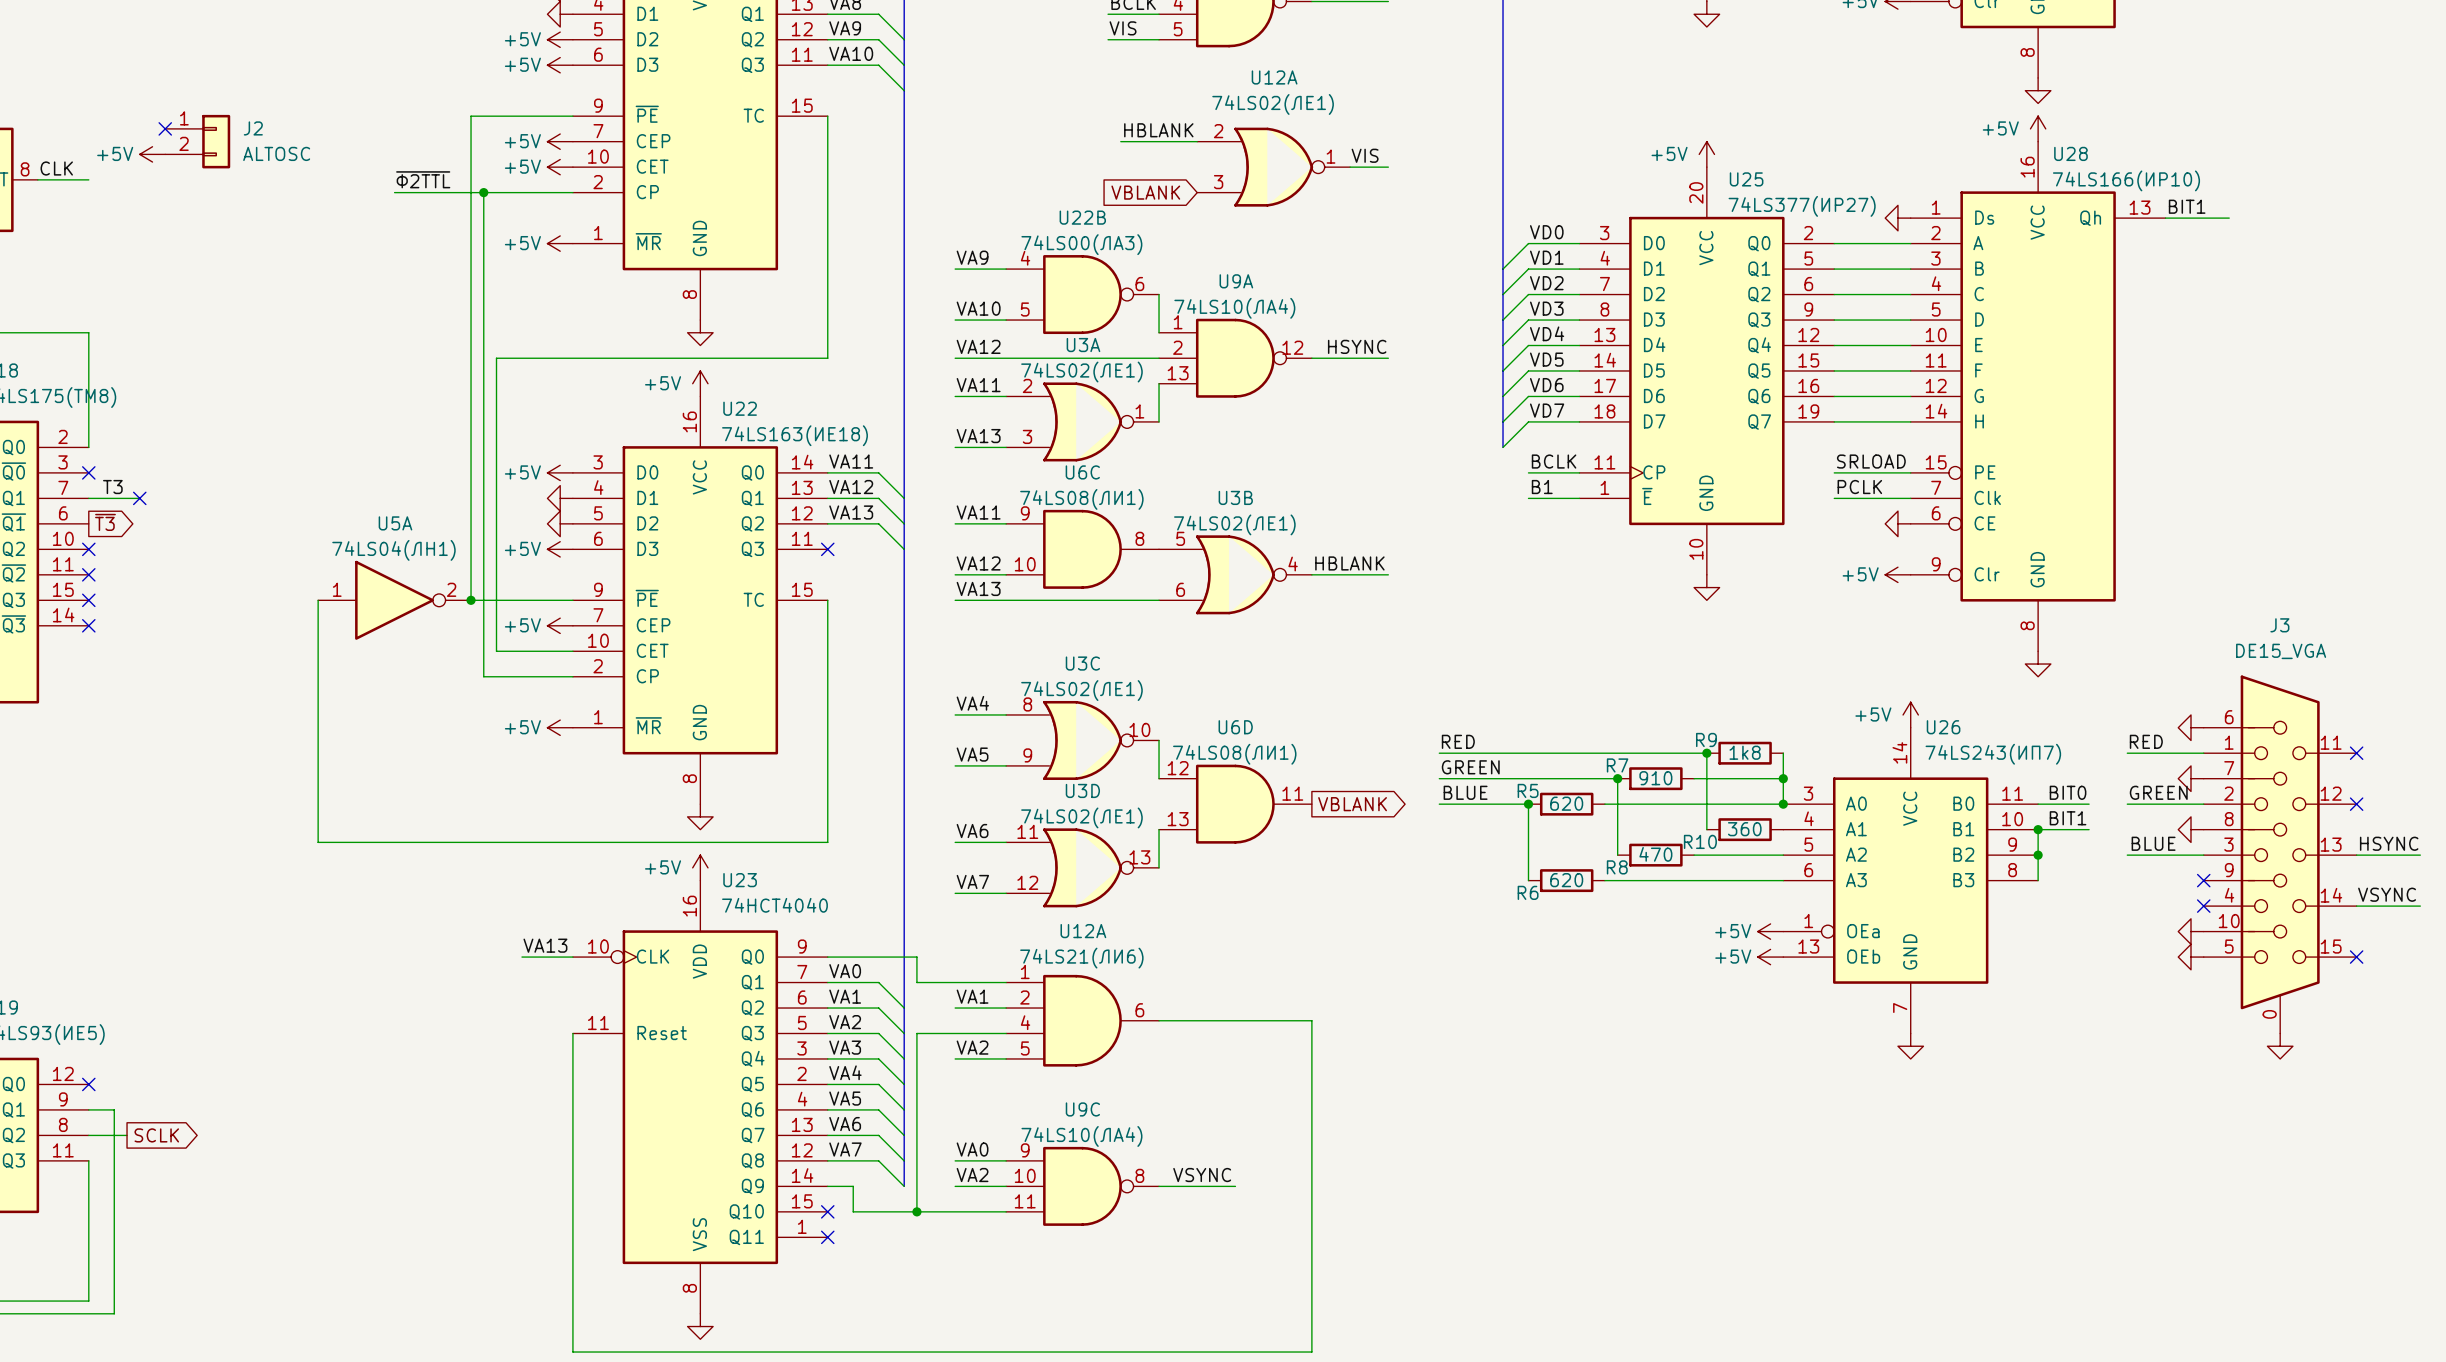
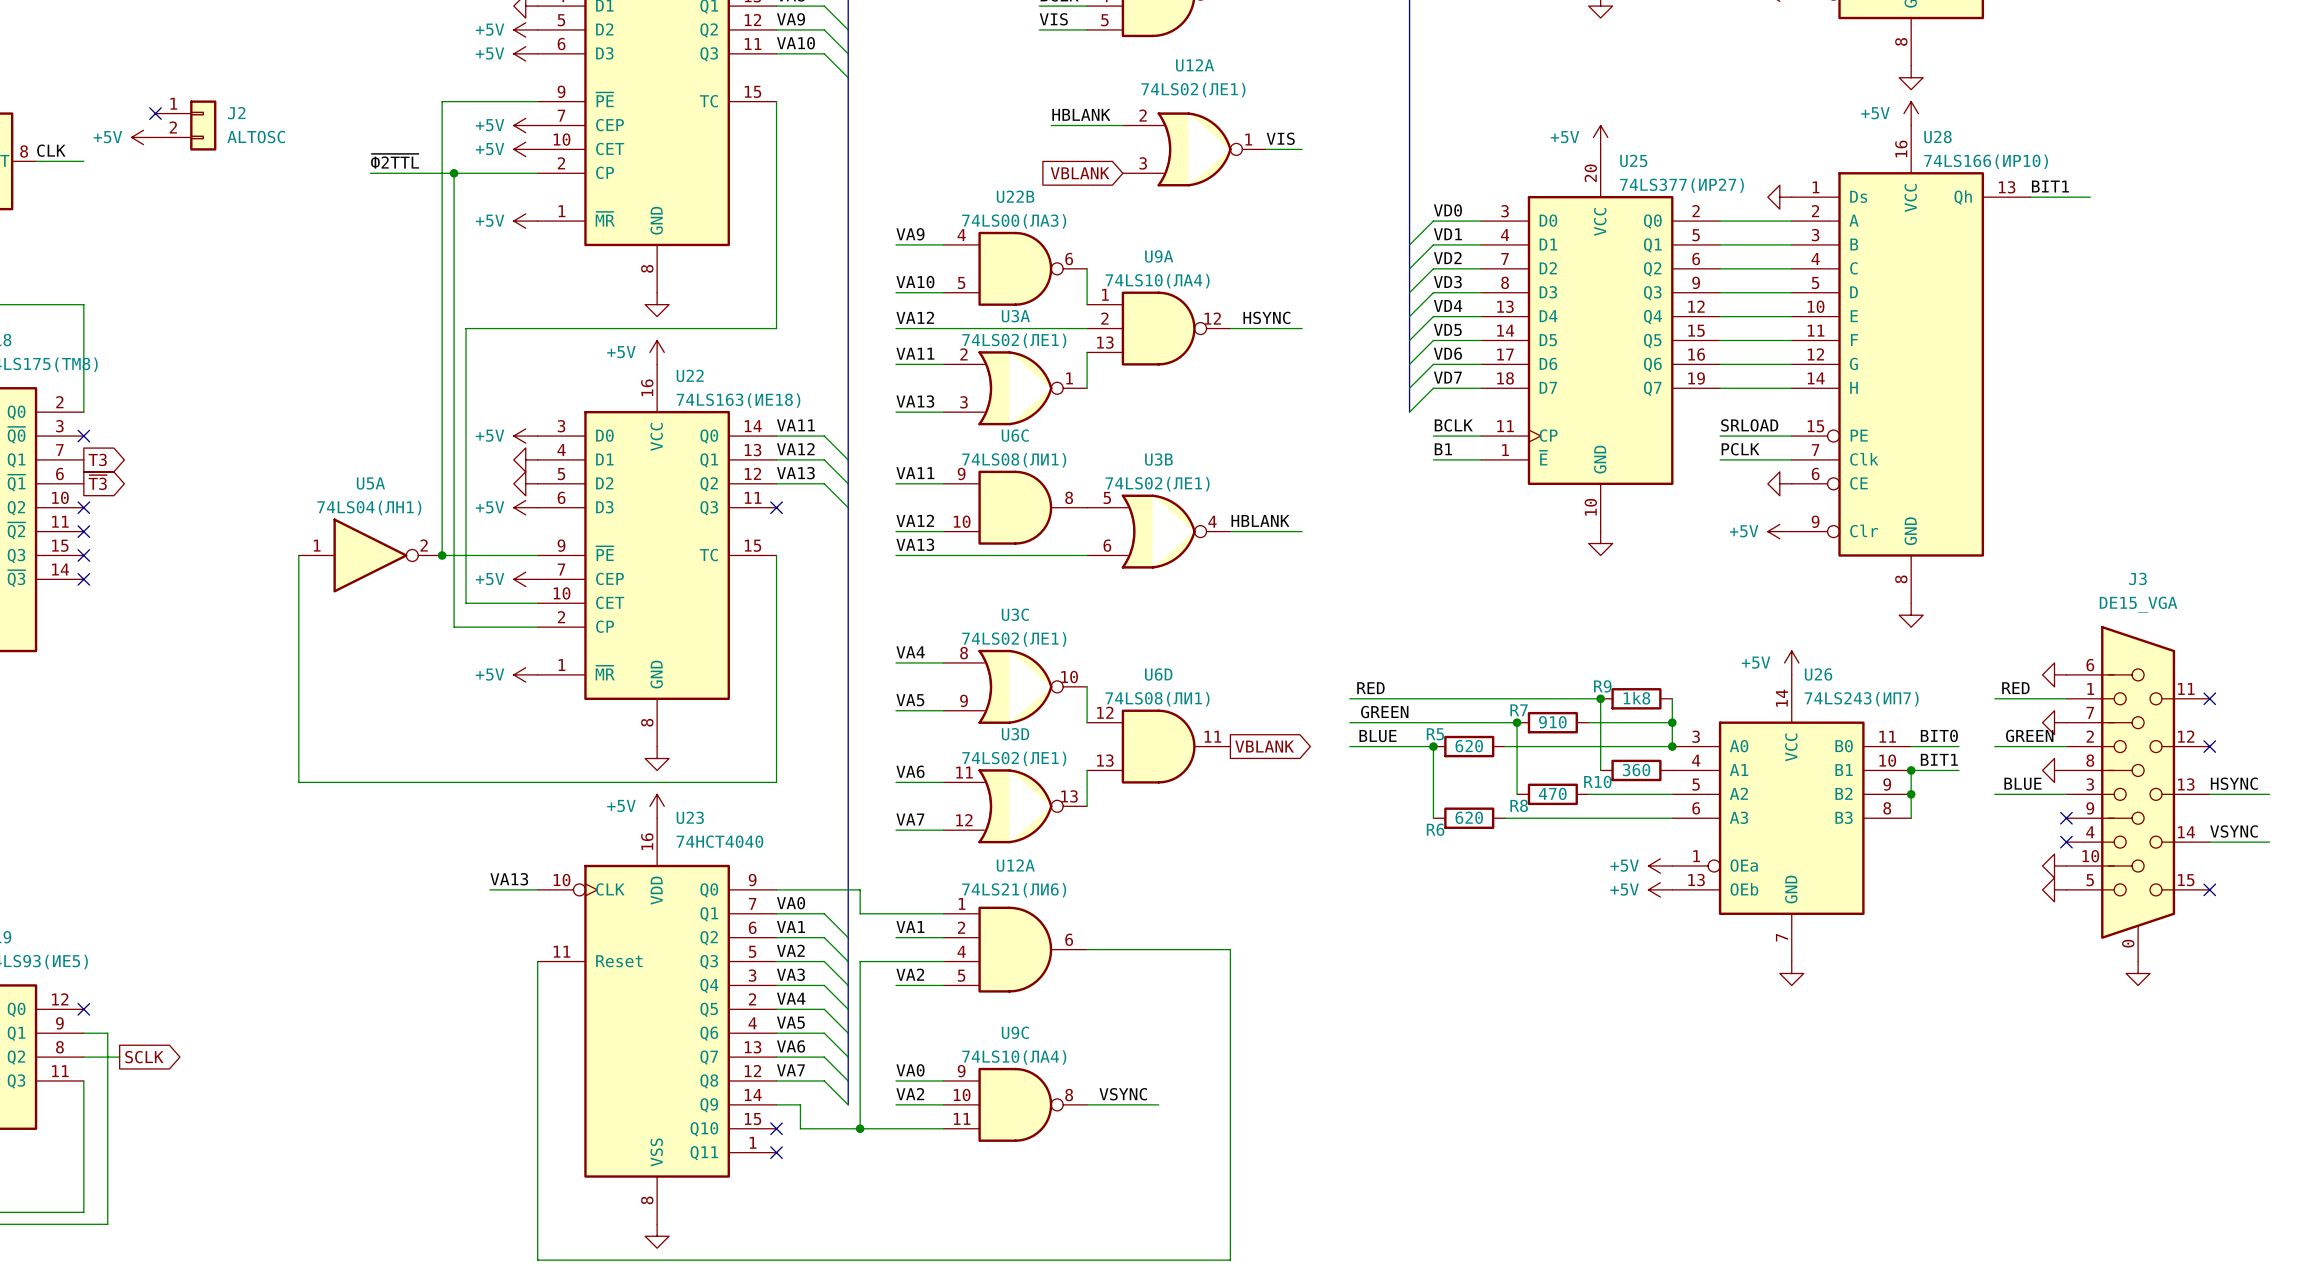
label: T3 (112, 487) -> none
wire: (88, 498) (139, 498) -> none
global label: none -> T3 (97, 459)
no-connect mark: (139, 498) -> none

